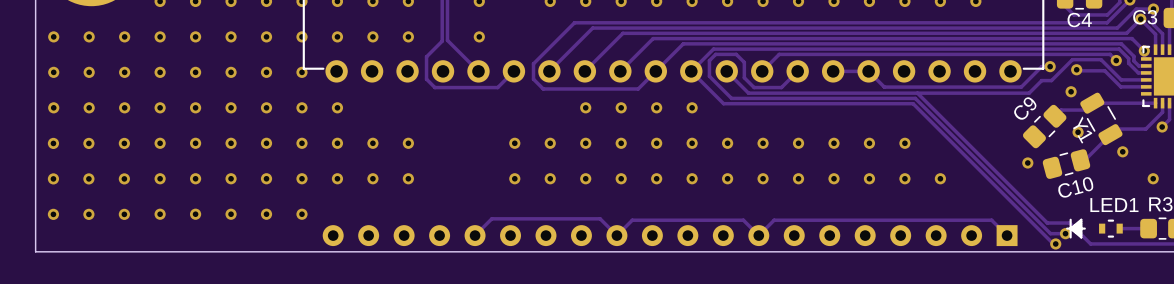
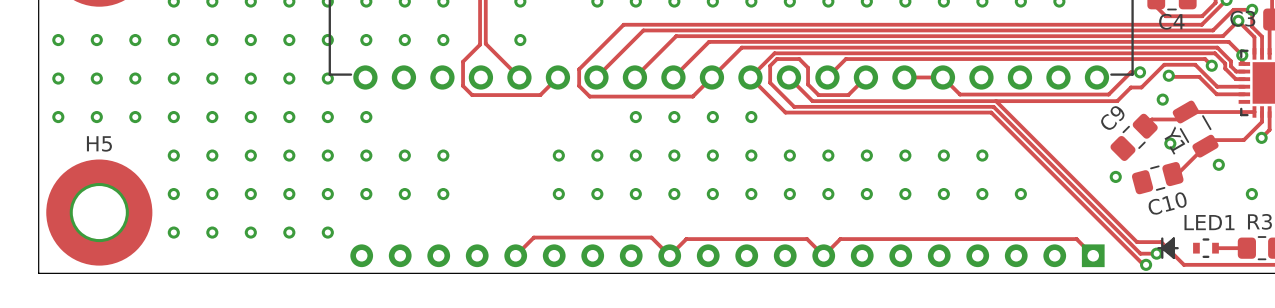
via: (53, 143) -> none
via: (88, 143) -> none
via: (124, 143) -> none
via: (53, 178) -> none
via: (88, 178) -> none
via: (124, 178) -> none
H5: none -> (99, 212)
via: (53, 214) -> none
via: (88, 214) -> none
via: (124, 214) -> none

